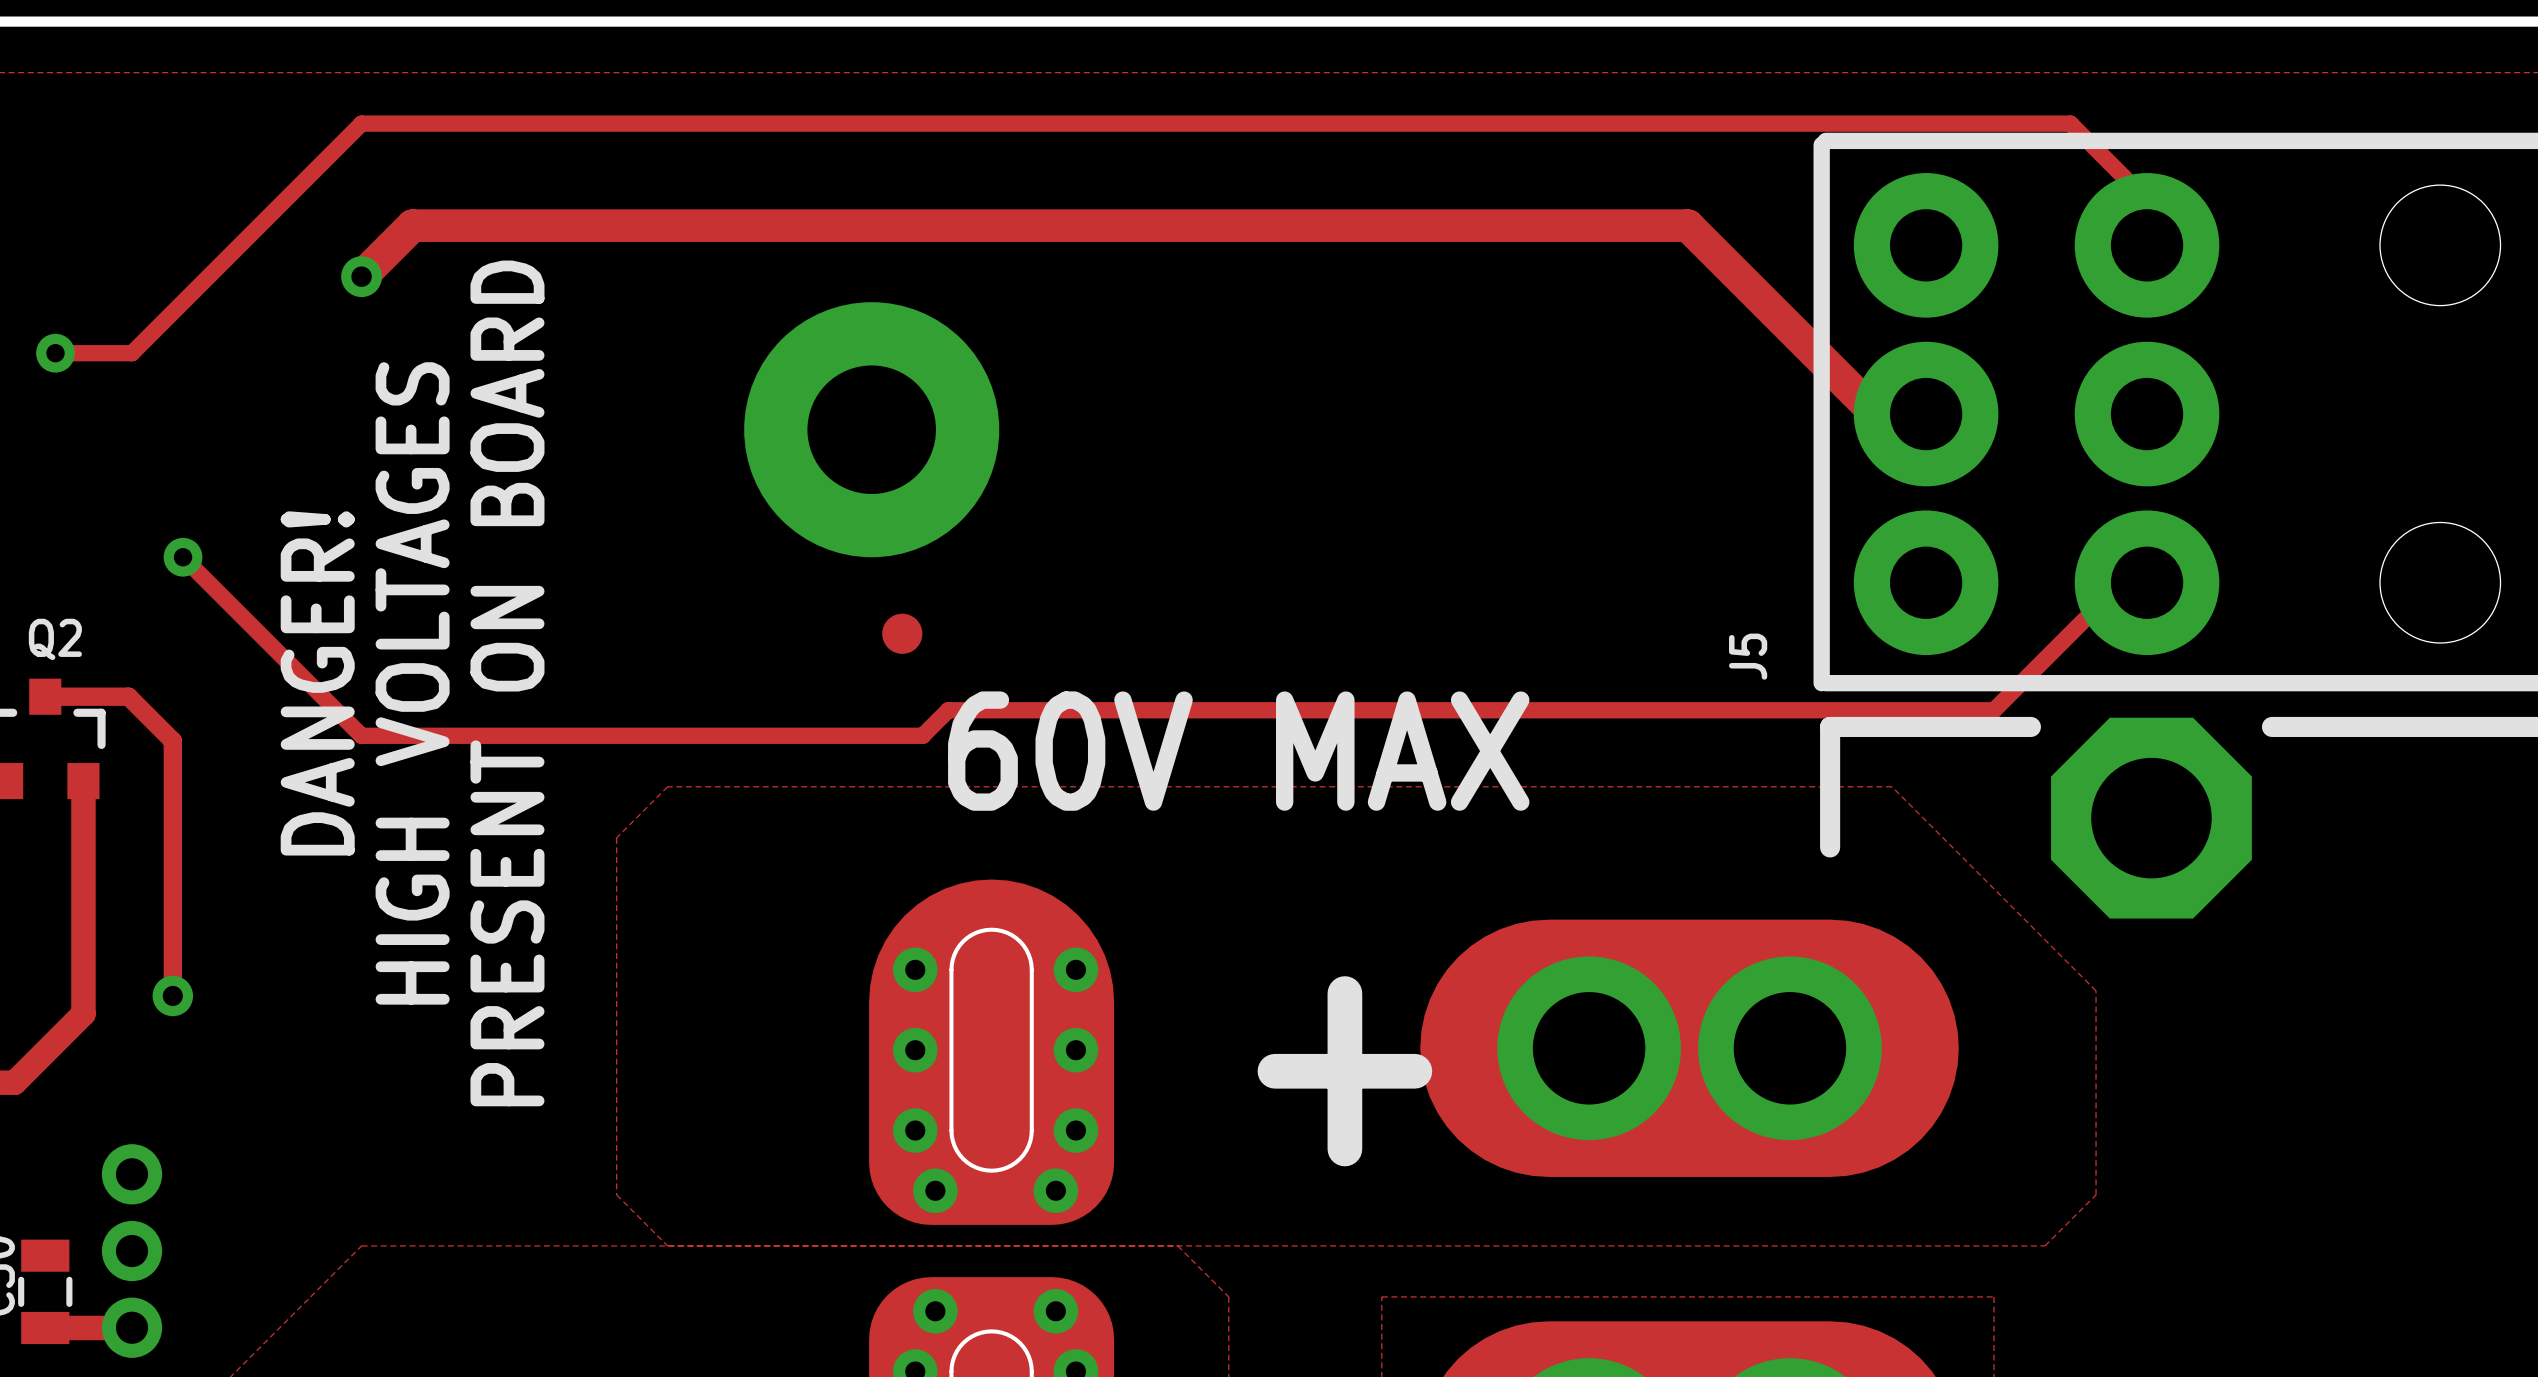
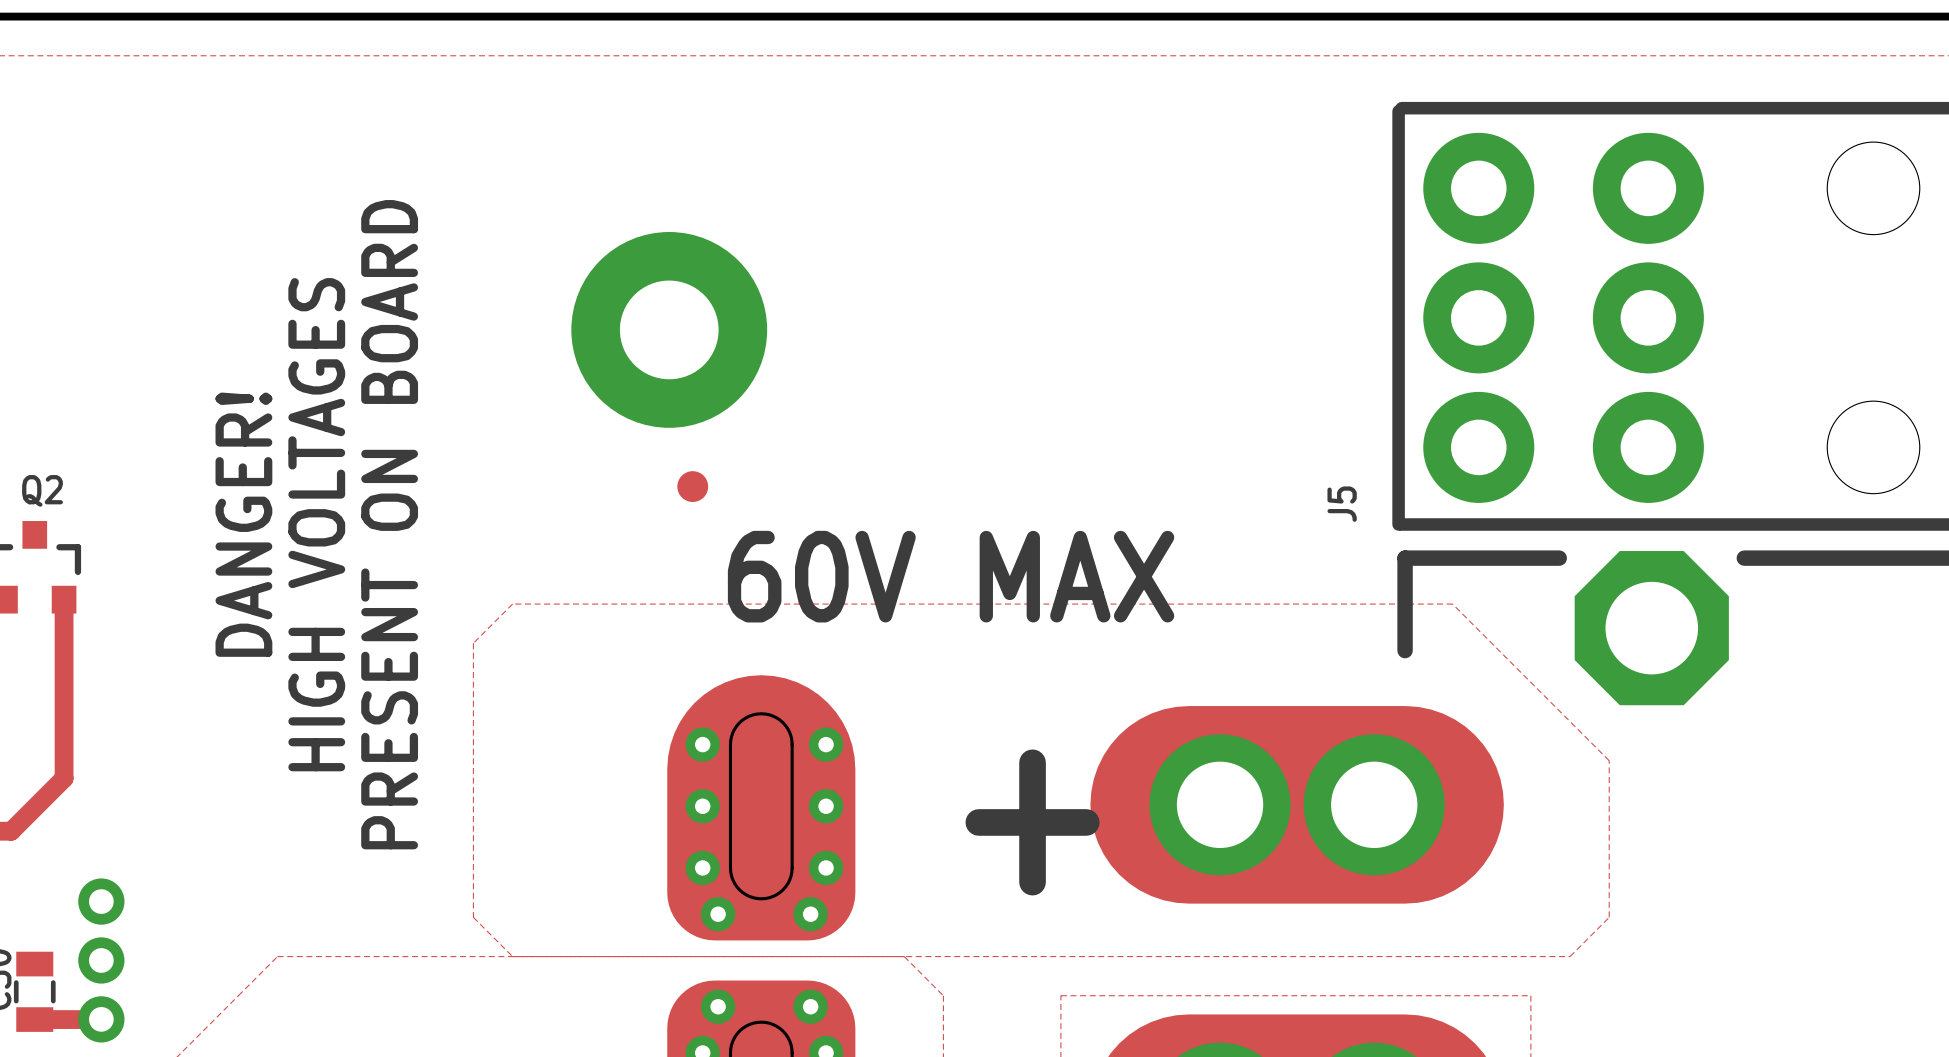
track: (2147, 245) (2147, 200) (2070, 123) (361, 123) (132, 353) (55, 353) -> none
track: (361, 276) (412, 225) (1687, 225) (1876, 414) (1926, 414) -> none
via: (361, 276) -> none
via: (55, 353) -> none
track: (183, 557) (361, 735) (922, 735) (948, 710) (1994, 710) (2121, 582) (2147, 582) -> none
via: (183, 557) -> none
track: (45, 696) (128, 696) (172, 740) (172, 995) -> none
via: (172, 995) -> none

